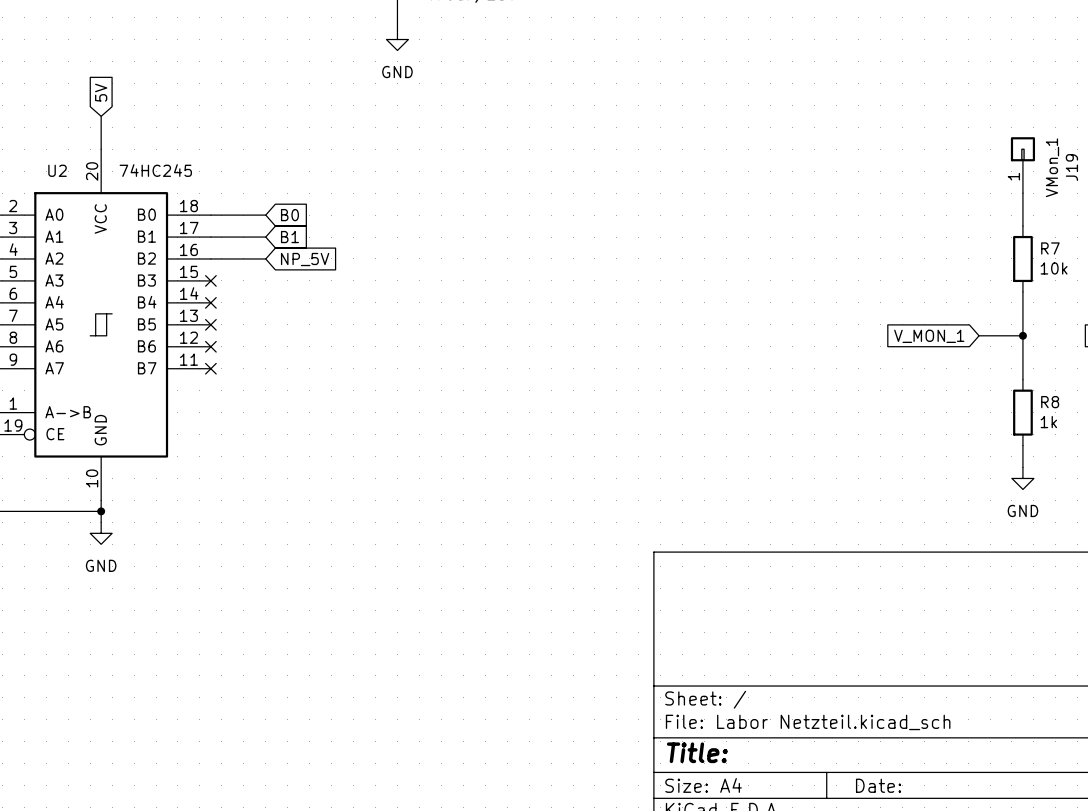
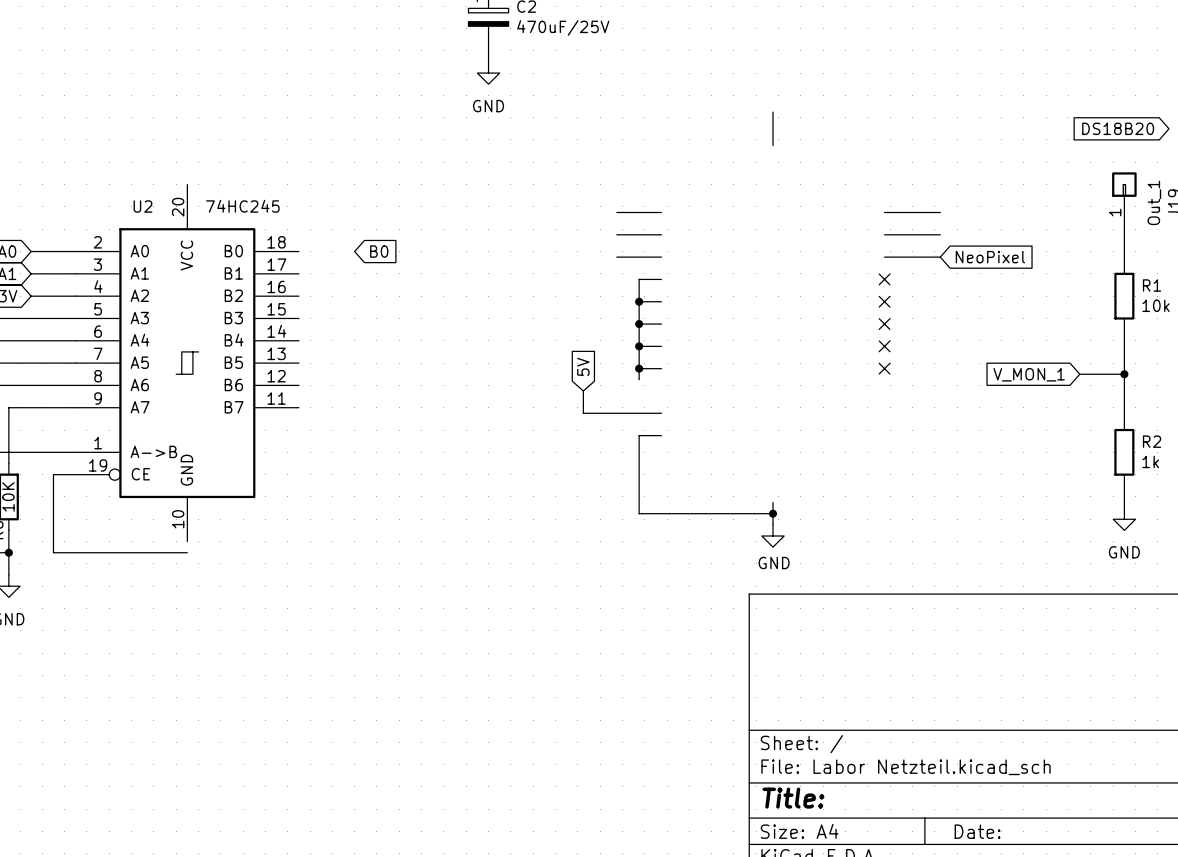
wire: none -> (773, 112) (773, 145)
global label: 5V (101, 92) -> none
global label: none -> DS18B20 (1118, 128)
wire: (101, 116) (101, 149) -> none
J19 value: VMon_1 (1052, 167) -> Out_1 (1154, 202)
wire: none -> (616, 212) (661, 212)
wire: none -> (884, 212) (940, 212)
wire: none -> (616, 234) (661, 234)
wire: none -> (884, 234) (940, 234)
wire: (210, 215) (265, 215) -> none
wire: none -> (616, 257) (661, 257)
wire: none -> (884, 257) (940, 257)
global label: none -> NeoPixel (990, 257)
wire: (210, 237) (265, 237) -> none
global label: B1 (289, 237) -> none
wire: none -> (661, 279) (639, 279) (639, 379)
no-connect mark: none -> (884, 279)
R7 name: R7 (1050, 248) -> R1 (1152, 285)
wire: (210, 258) (265, 258) -> none
global label: NP_5V (305, 259) -> none
wire: none -> (639, 301) (661, 301)
junction: none -> (639, 301)
no-connect mark: none -> (884, 301)
no-connect mark: (210, 280) -> none
wire: none -> (639, 324) (661, 324)
junction: none -> (639, 324)
no-connect mark: none -> (884, 324)
no-connect mark: (210, 302) -> none
wire: none -> (639, 346) (661, 346)
junction: none -> (639, 346)
no-connect mark: none -> (884, 346)
no-connect mark: (210, 324) -> none
global label: none -> 5V (583, 366)
wire: none -> (639, 368) (661, 368)
junction: none -> (639, 368)
no-connect mark: none -> (884, 368)
no-connect mark: (210, 346) -> none
wire: none -> (583, 390) (583, 413) (661, 413)
no-connect mark: (210, 368) -> none
wire: none -> (661, 435) (639, 435) (639, 513) (773, 513)
R8 name: R8 (1050, 402) -> R2 (1152, 441)
wire: none -> (773, 502) (773, 524)
junction: none -> (773, 513)
power symbol: none -> GND (773, 536)
wire: (101, 500) (101, 522) -> none
junction: (101, 511) -> none
power symbol: GND (101, 533) -> none

